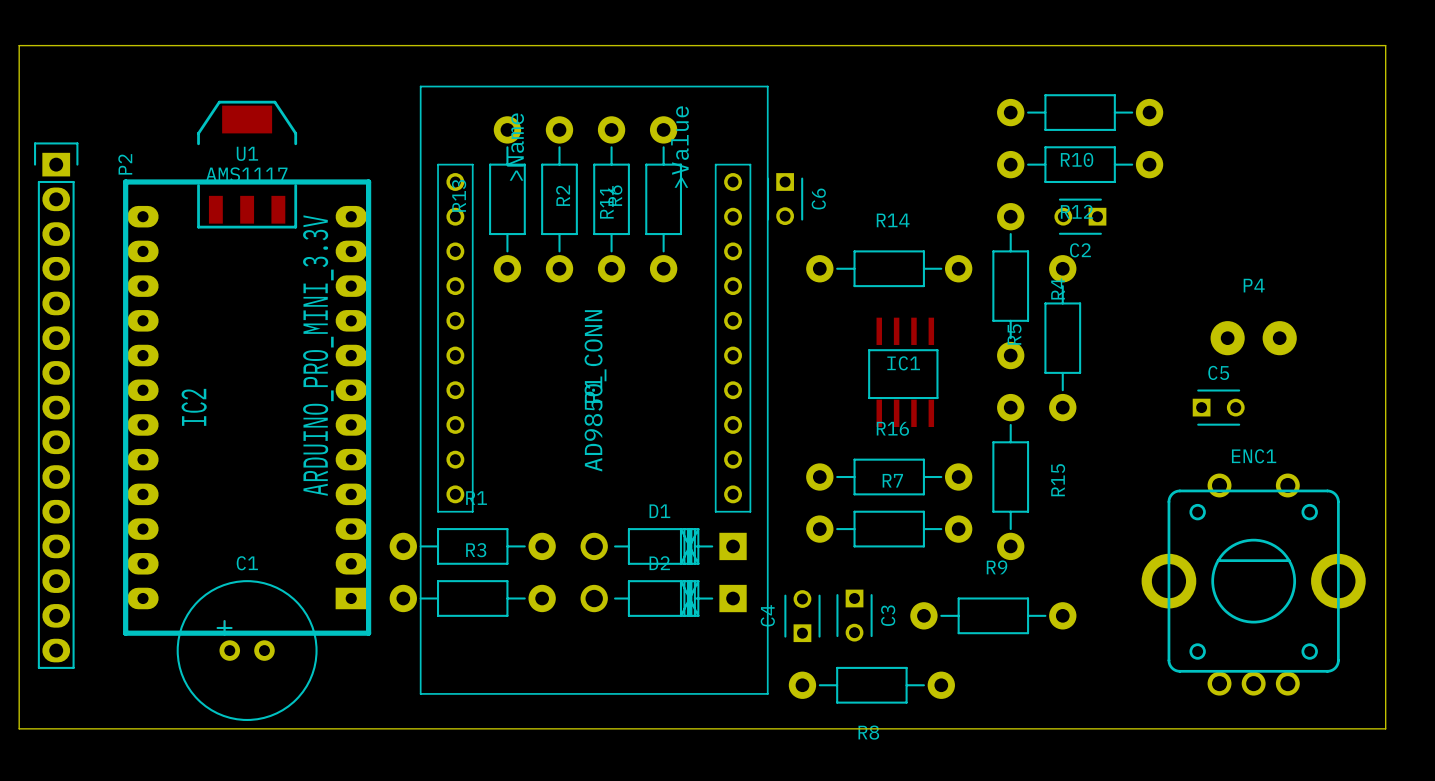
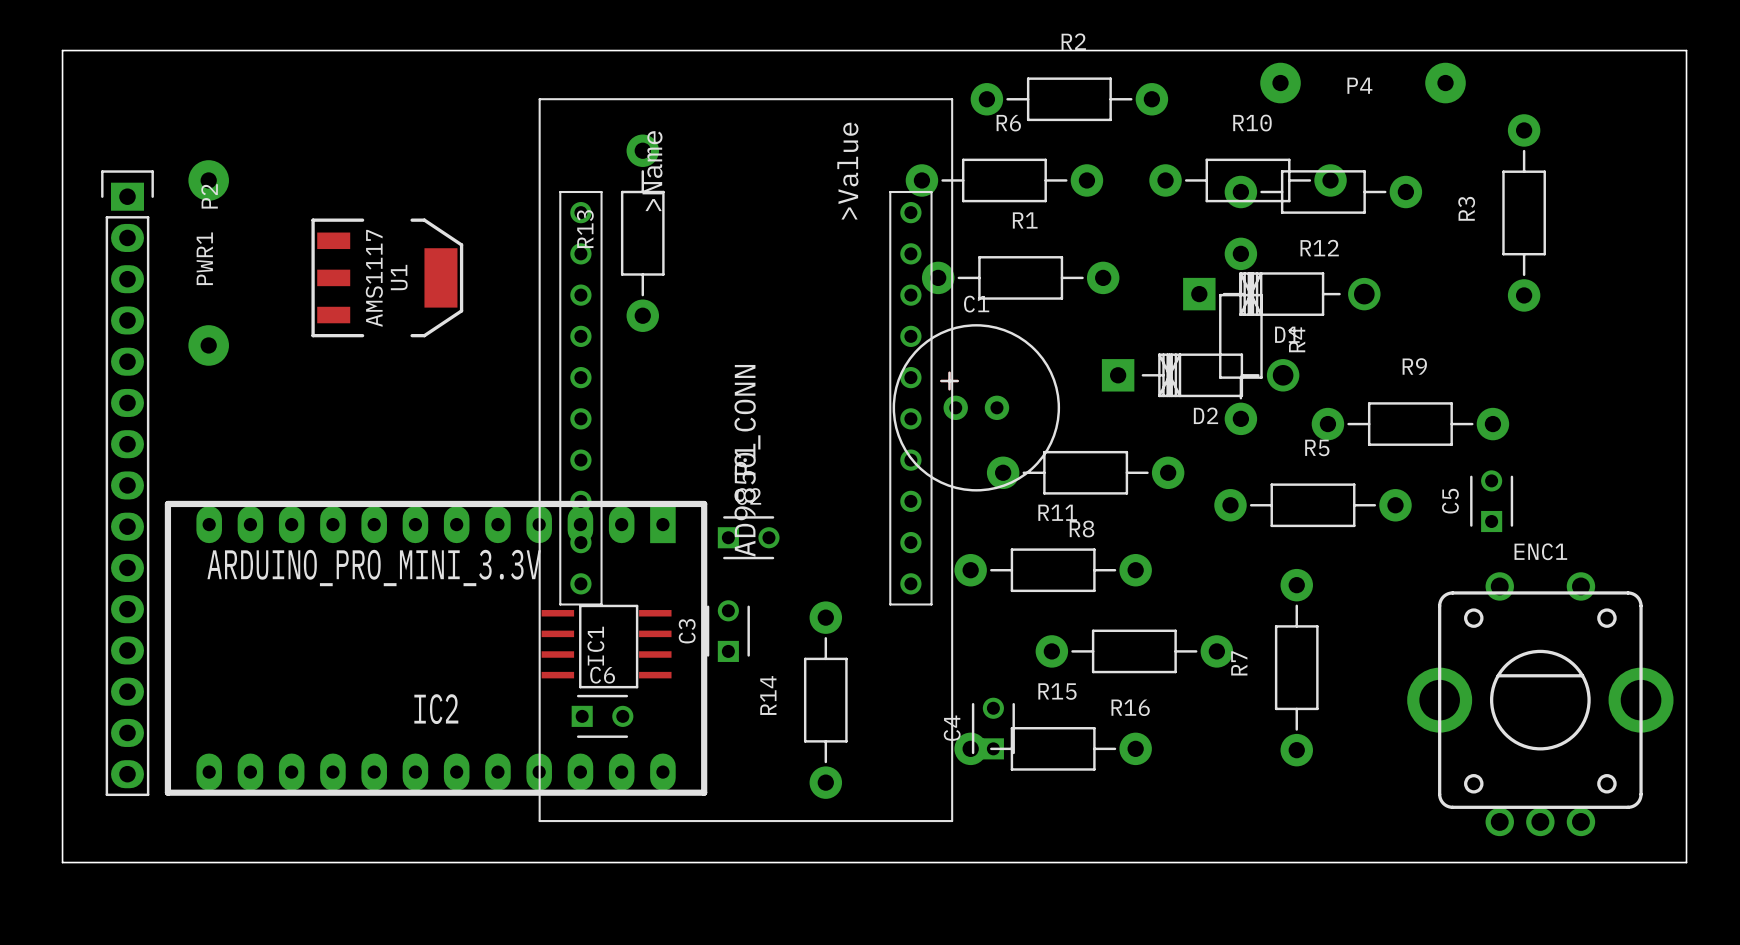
R10 position: (1080, 112) -> (1248, 180)
R10 name position: R10 (1077, 159) -> R10 (1252, 123)
U1 rotation: 0° (247, 164) -> 90° clockwise (387, 277)
U1 position: (247, 164) -> (387, 277)
R11 rotation: 0° (559, 199) -> 90° clockwise (1053, 570)
R11 position: (559, 199) -> (1053, 570)
R2 rotation: 0° (611, 199) -> 90° clockwise (1069, 99)
R2 position: (611, 199) -> (1069, 99)
R6 rotation: 0° (663, 199) -> 90° clockwise (1004, 180)
R6 position: (663, 199) -> (1004, 180)
C6 rotation: 0° (785, 199) -> 90° counterclockwise (602, 716)
C6 position: (785, 199) -> (602, 716)
R11 name position: R11 (606, 202) -> R11 (1057, 512)
C2 rotation: 0° (1080, 216) -> 180° (748, 537)
C2 position: (1080, 216) -> (748, 537)
R14 name position: R14 (893, 220) -> R14 (768, 695)
PWR1: none -> (208, 262)
R14 rotation: 0° (889, 268) -> 90° clockwise (825, 700)
R14 position: (889, 268) -> (825, 700)
P4 name position: P4 (1254, 285) -> P4 (1359, 85)
P4 footprint: [1210, 321, 1297, 356] -> [1260, 62, 1466, 104]
R5 rotation: 0° (1062, 338) -> 90° clockwise (1313, 505)
IC1 rotation: 0° (903, 372) -> 90° counterclockwise (606, 646)
IC1 position: (903, 372) -> (606, 646)
P2 position: (56, 405) -> (127, 483)
IC2 rotation: 0° (247, 407) -> 90° counterclockwise (436, 648)
C5 rotation: 0° (1218, 407) -> 90° counterclockwise (1491, 501)
R16 name position: R16 (892, 428) -> R16 (1130, 707)
R16 position: (889, 477) -> (1134, 651)
R15 rotation: 0° (1010, 477) -> 90° clockwise (1053, 748)
R15 position: (1010, 477) -> (1053, 748)
R7 name position: R7 (892, 480) -> R7 (1239, 663)
R15 name position: R15 (1058, 480) -> R15 (1057, 691)
R7 rotation: 0° (889, 529) -> 90° clockwise (1296, 667)
R7 position: (889, 529) -> (1296, 667)
R1 position: (472, 546) -> (1020, 277)
D1 rotation: 0° (663, 546) -> 180° (1281, 294)
D1 position: (663, 546) -> (1281, 294)
R3 name position: R3 (476, 550) -> R3 (1466, 208)
ENC1 position: (1253, 584) -> (1540, 704)
R3 rotation: 0° (472, 598) -> 90° clockwise (1524, 212)
R3 position: (472, 598) -> (1524, 212)
D2 rotation: 0° (663, 598) -> 180° (1200, 375)
D2 position: (663, 598) -> (1200, 375)
C3 rotation: 0° (854, 615) -> 180° (728, 631)
C3 position: (854, 615) -> (728, 631)
R9 position: (993, 615) -> (1410, 424)
C1 position: (247, 650) -> (976, 407)
R8 position: (871, 685) -> (1085, 472)

